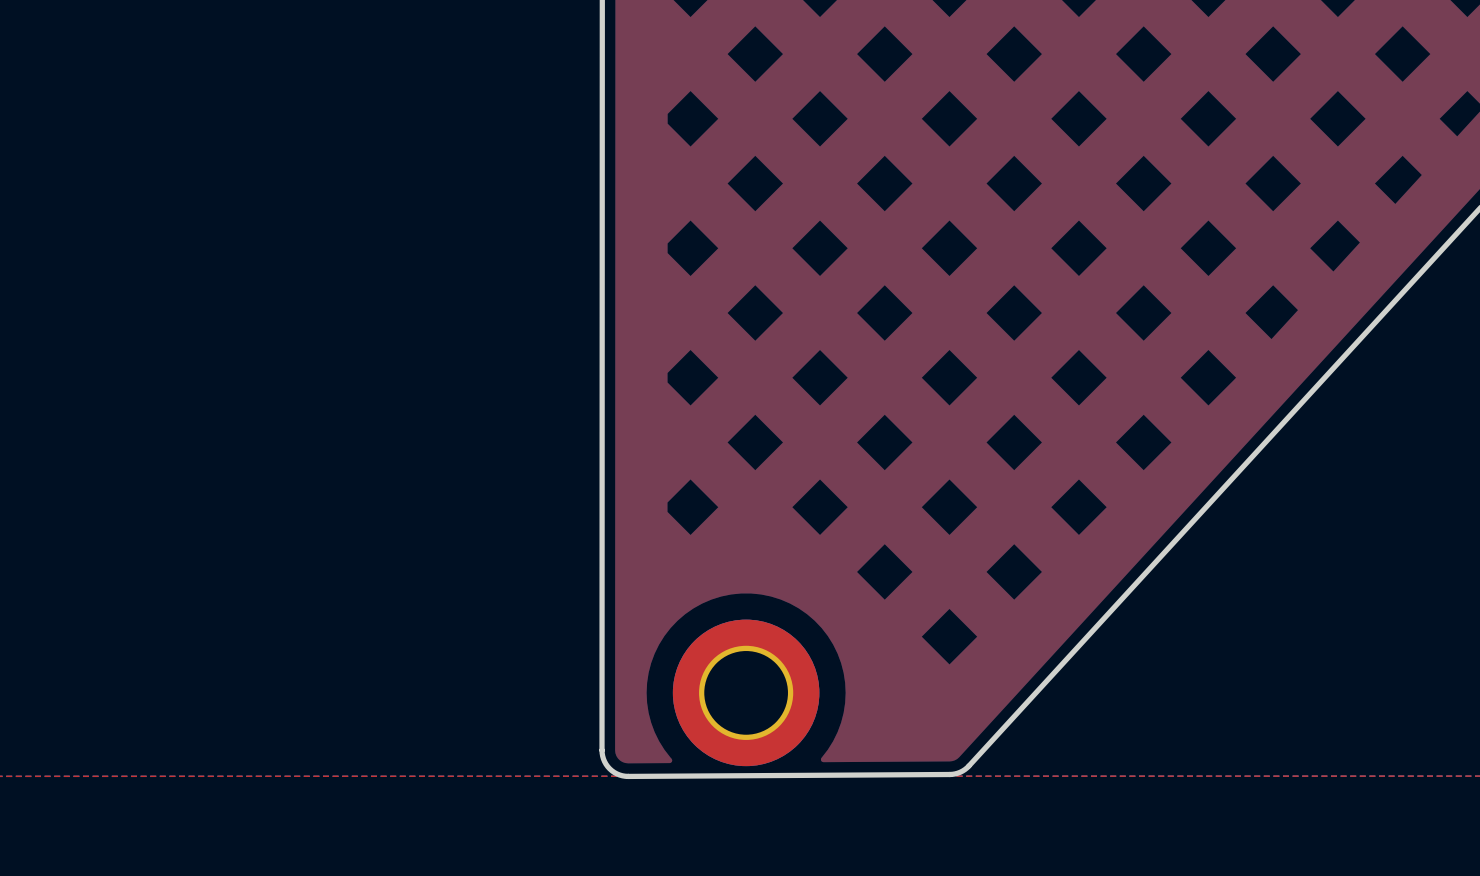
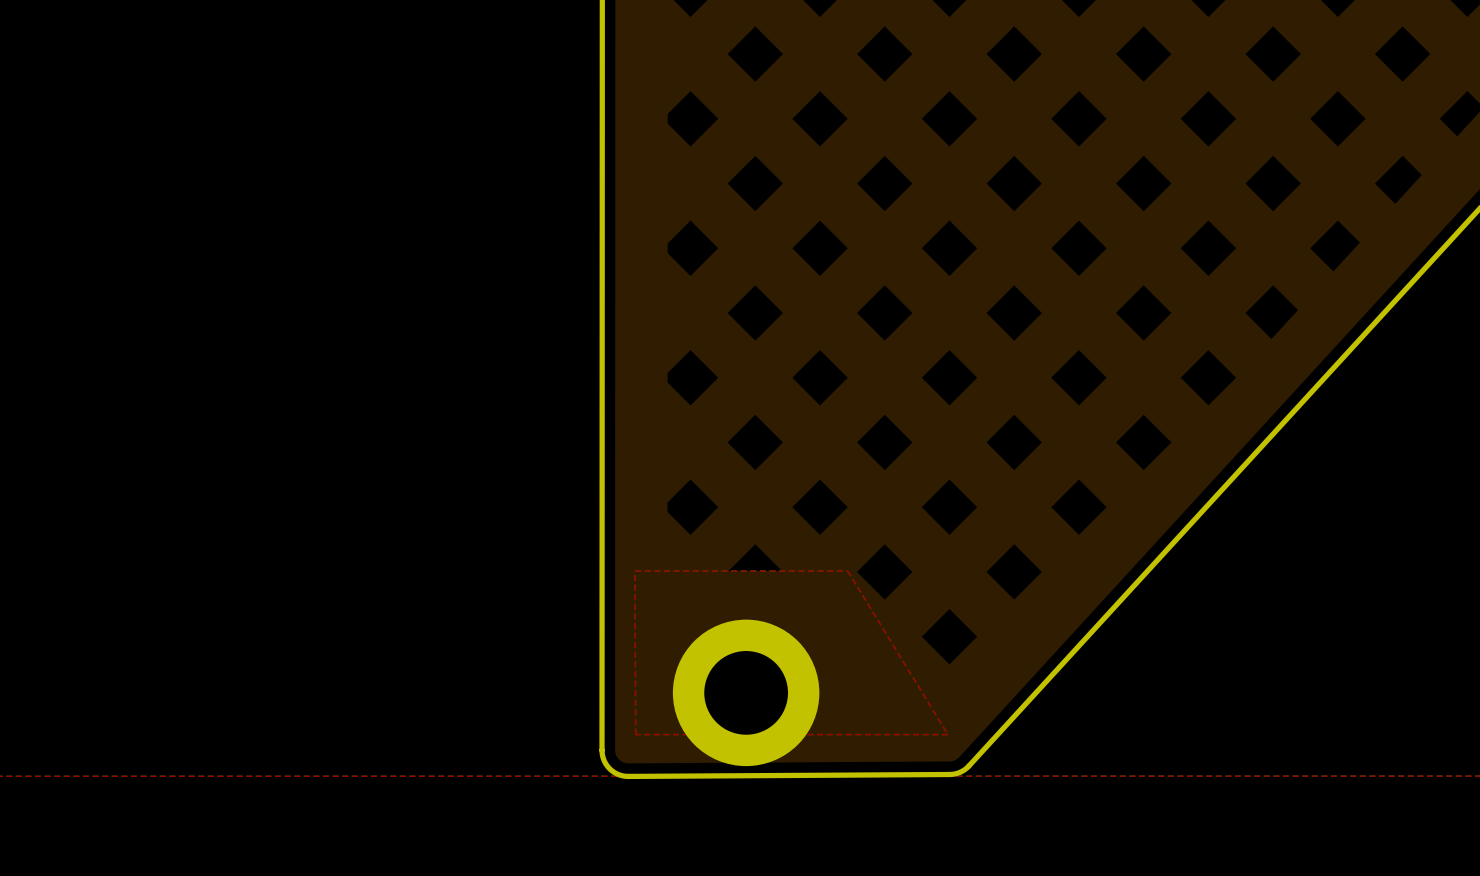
top zone outline: none -> (635, 571) (847, 571) (947, 734) (635, 734) (635, 571)
part footprint: [672, 619, 820, 767] -> [672, 619, 820, 767]

